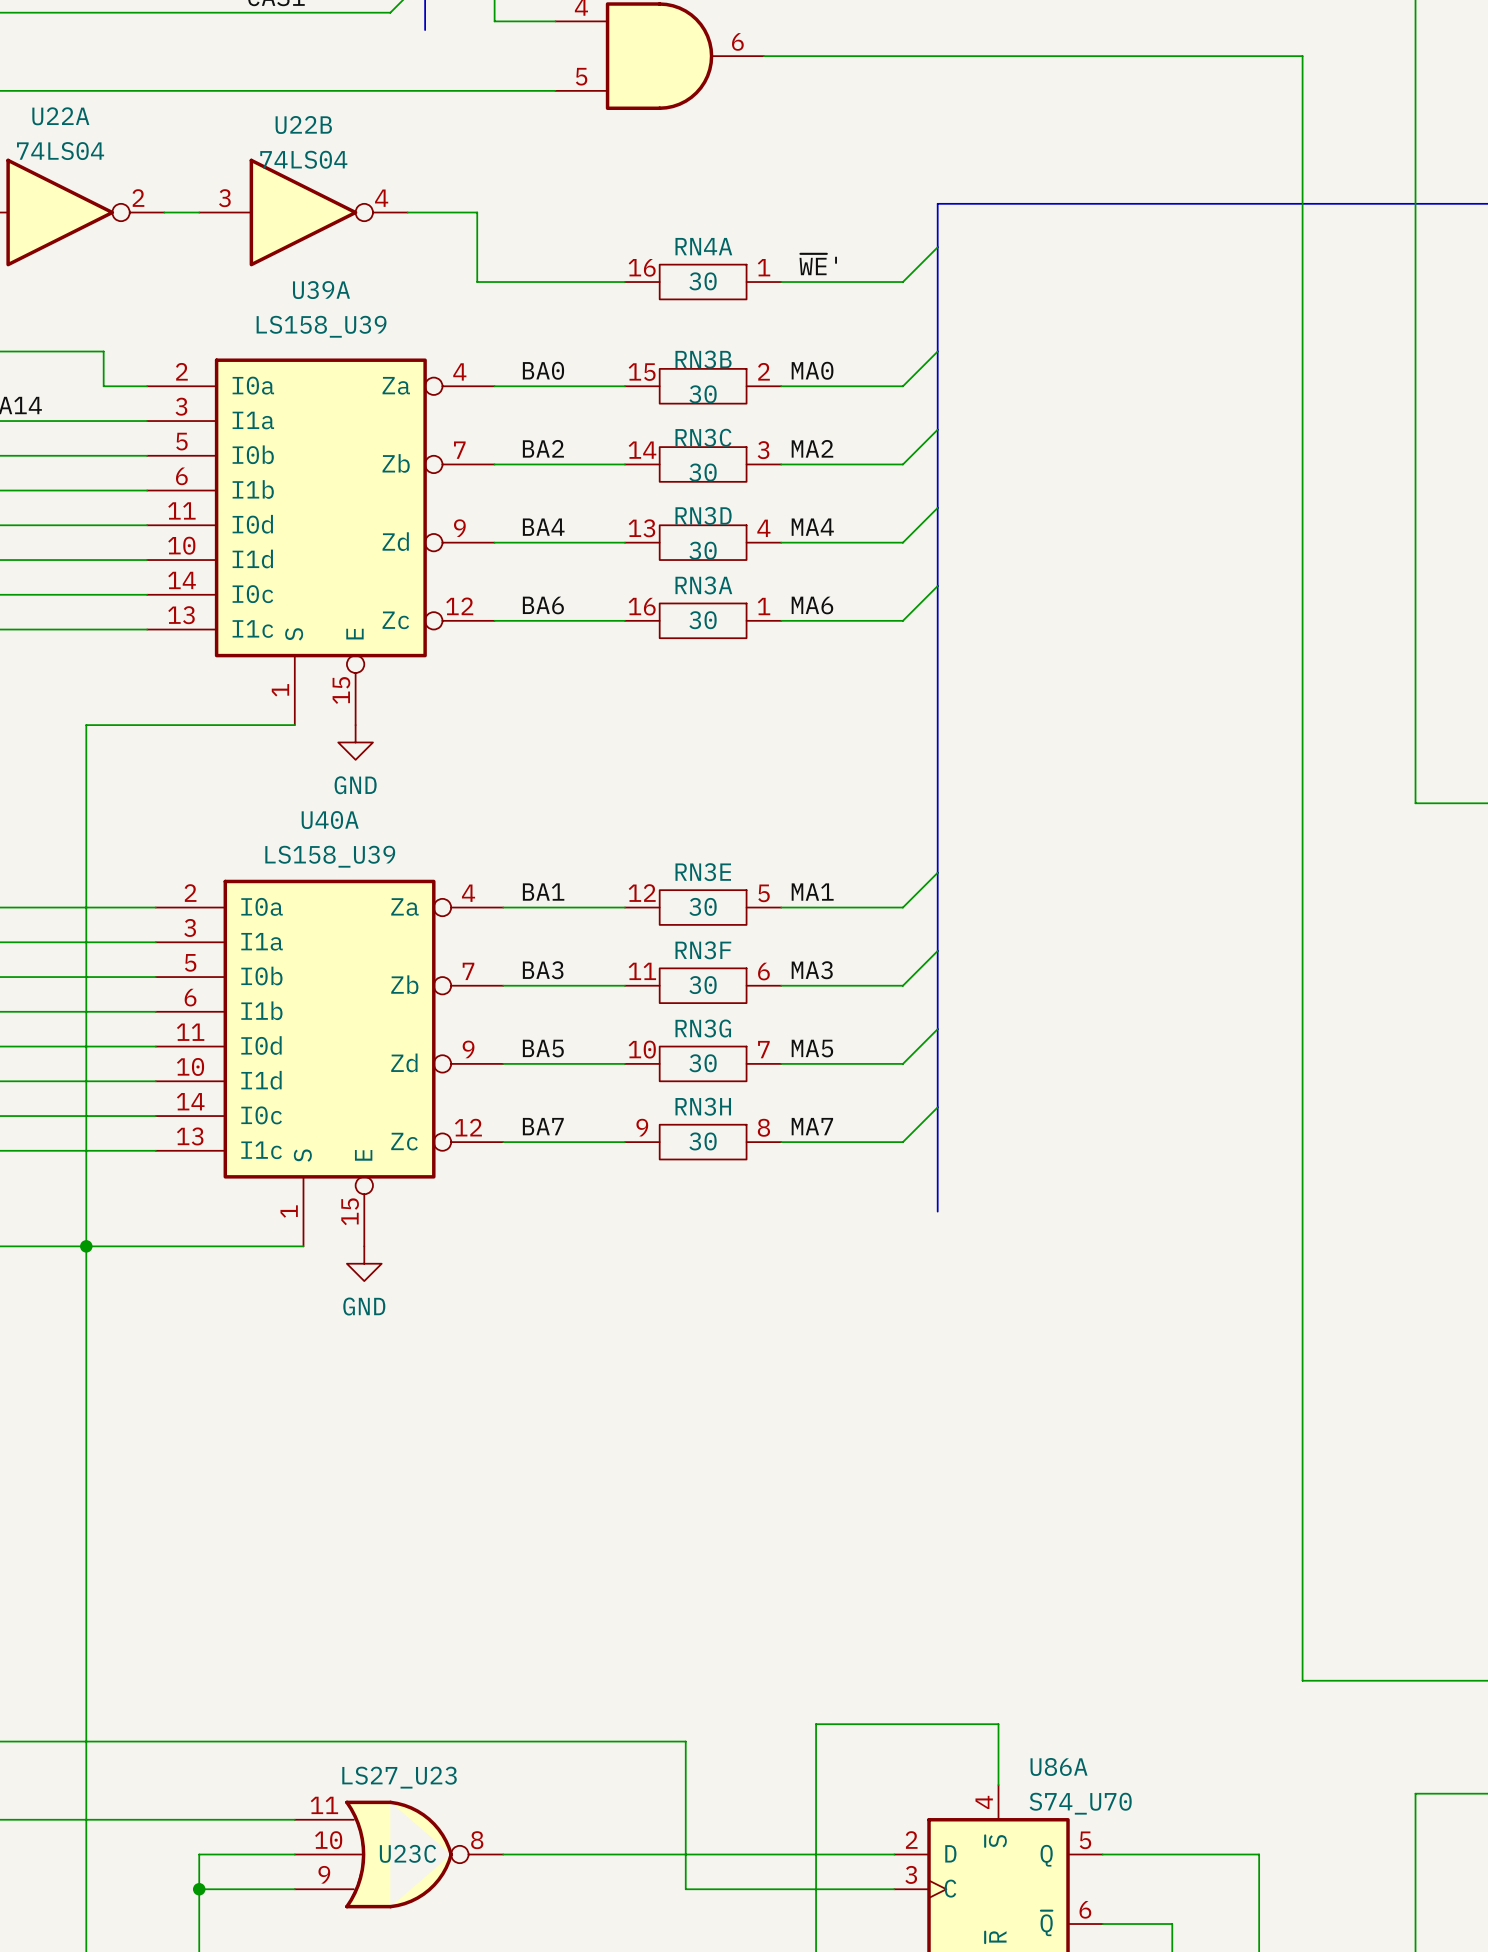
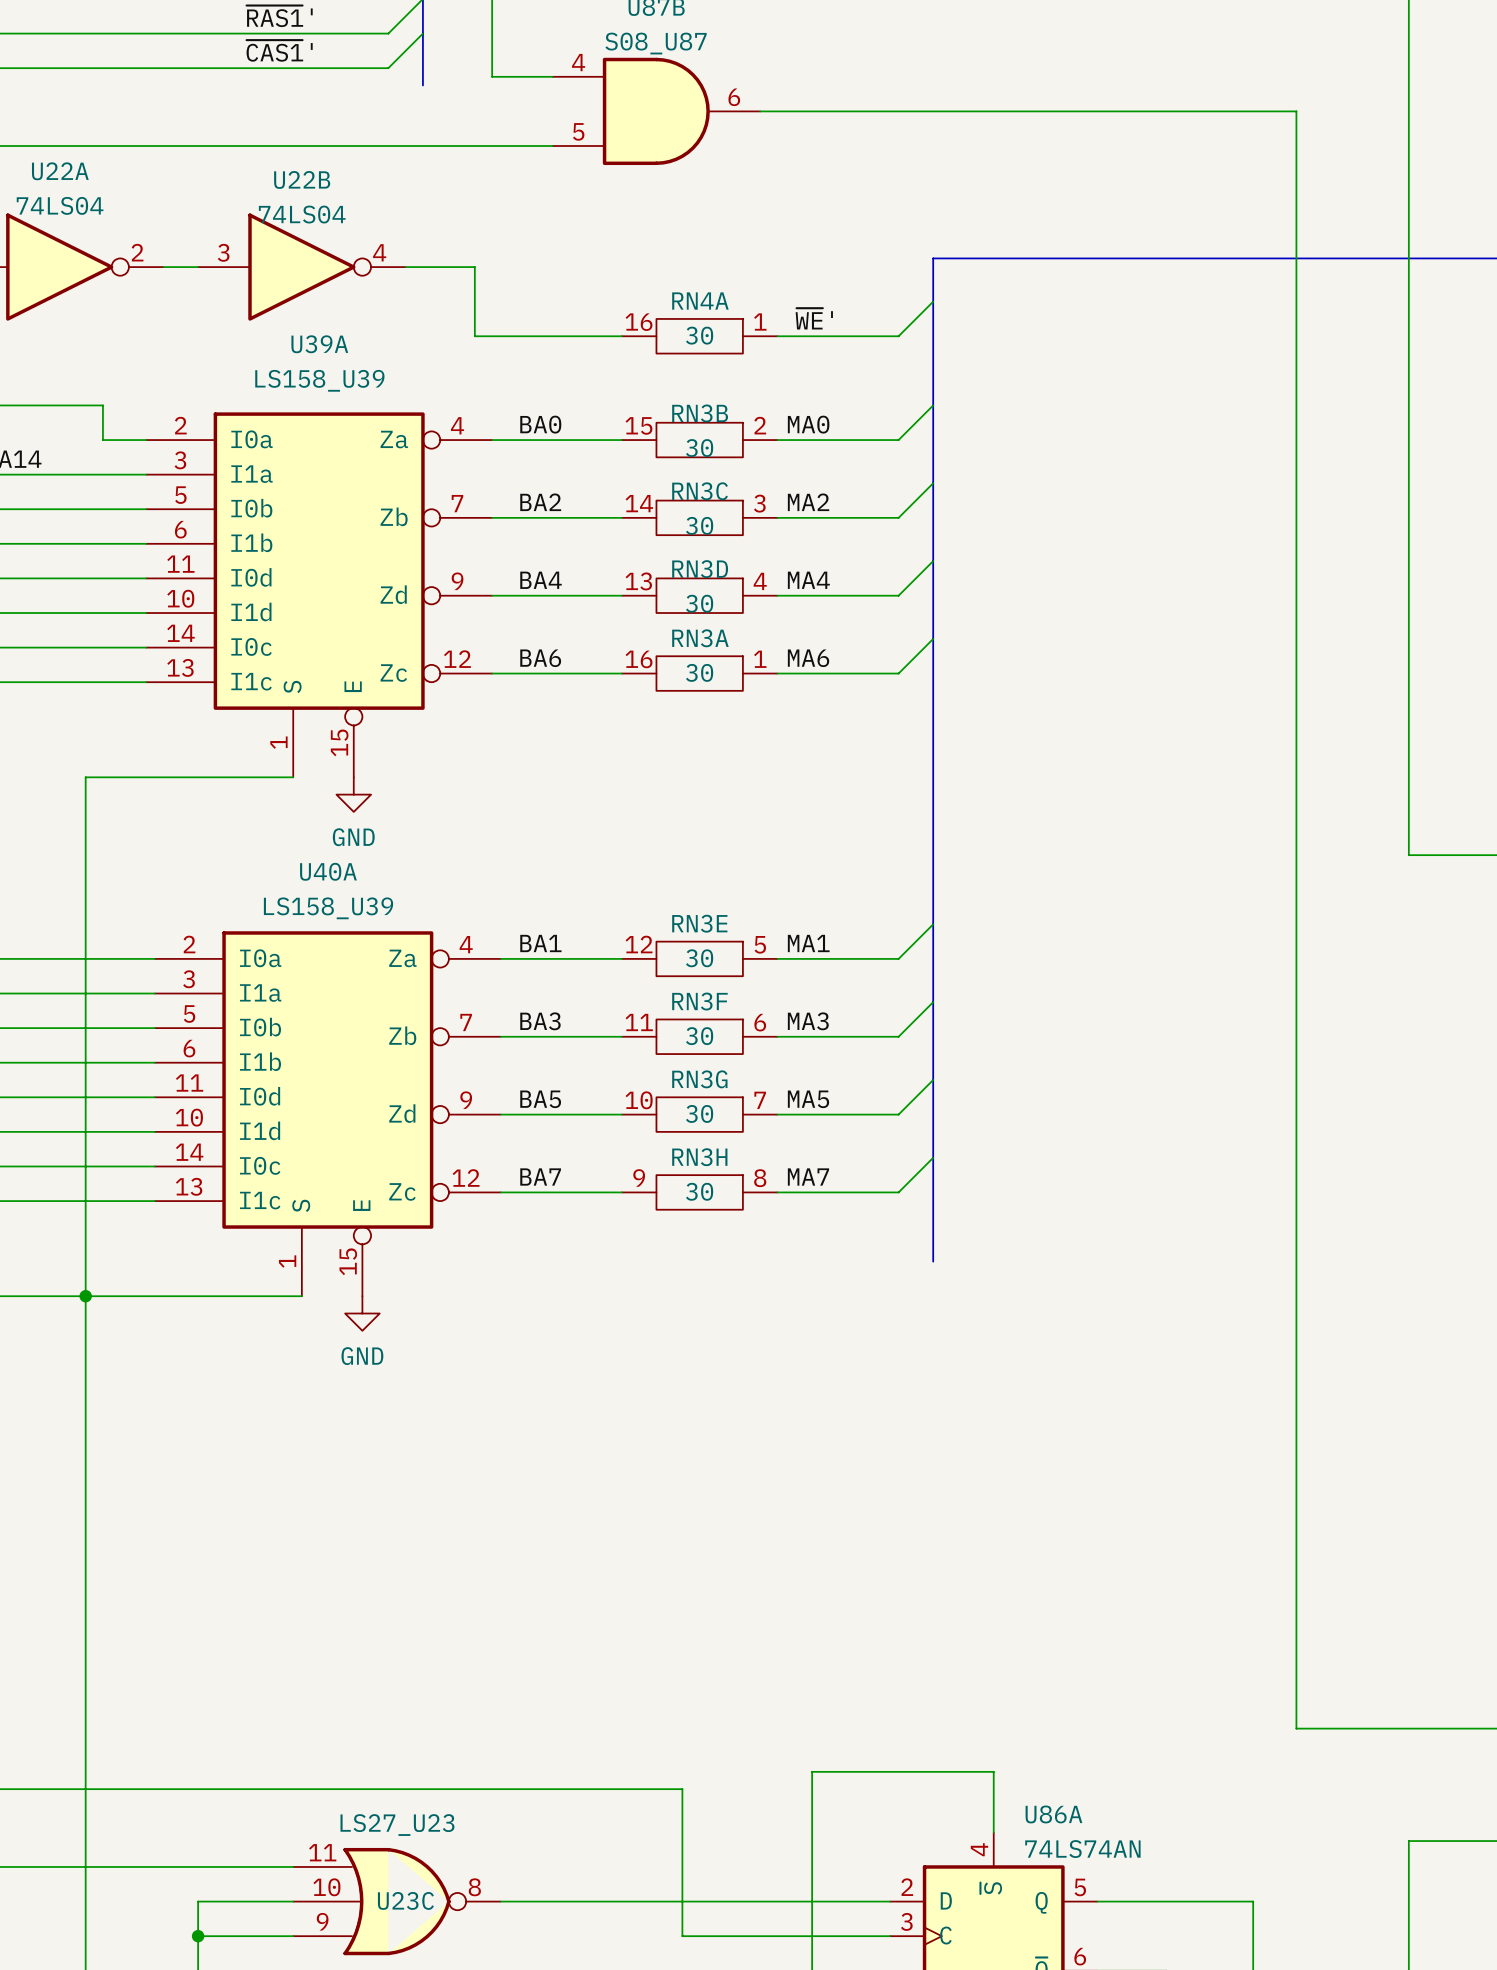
U86A value: S74_U70 (1080, 1803) -> 74LS74AN (1082, 1849)

